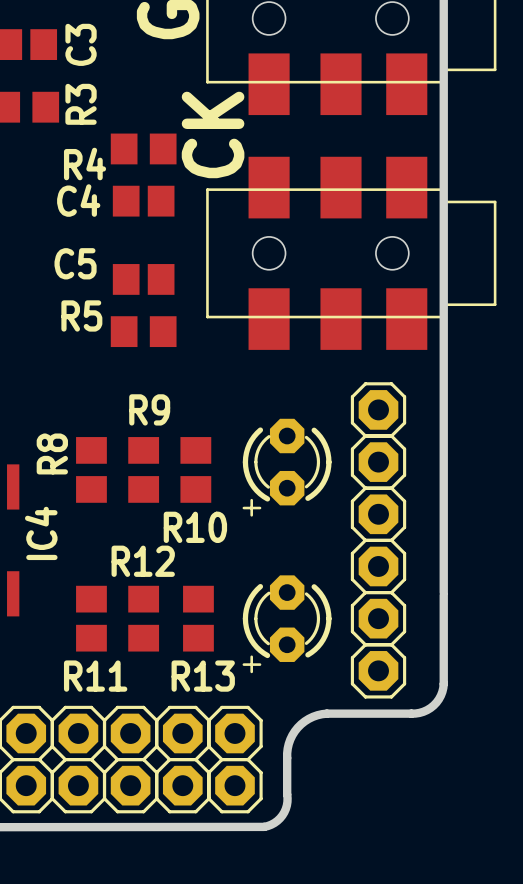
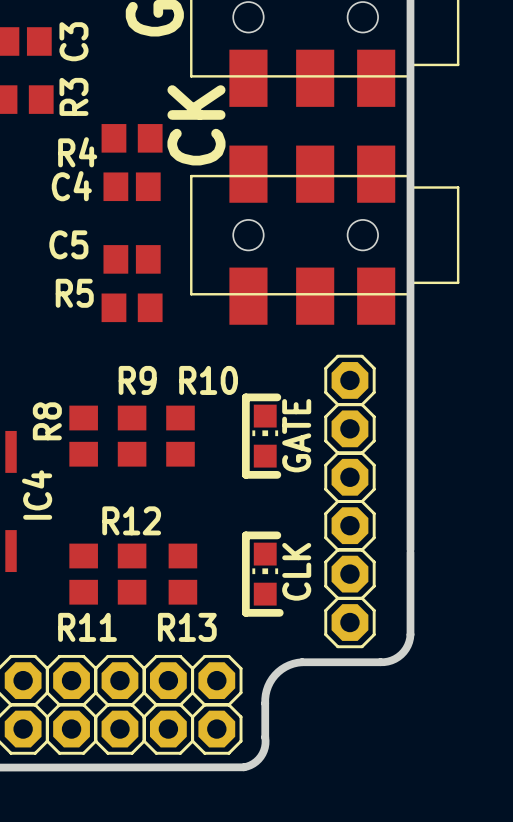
part footprint: [242, 418, 332, 517] -> [252, 404, 279, 468]
line: none -> (277, 397) (245, 397) (245, 474) (277, 474)
text: none -> GATE (296, 435)
R10 name position: R10 (195, 527) -> R10 (208, 380)
part footprint: [242, 575, 332, 674] -> [252, 542, 279, 606]
line: none -> (277, 535) (245, 535) (245, 612) (279, 612)
text: none -> CLK (296, 571)

